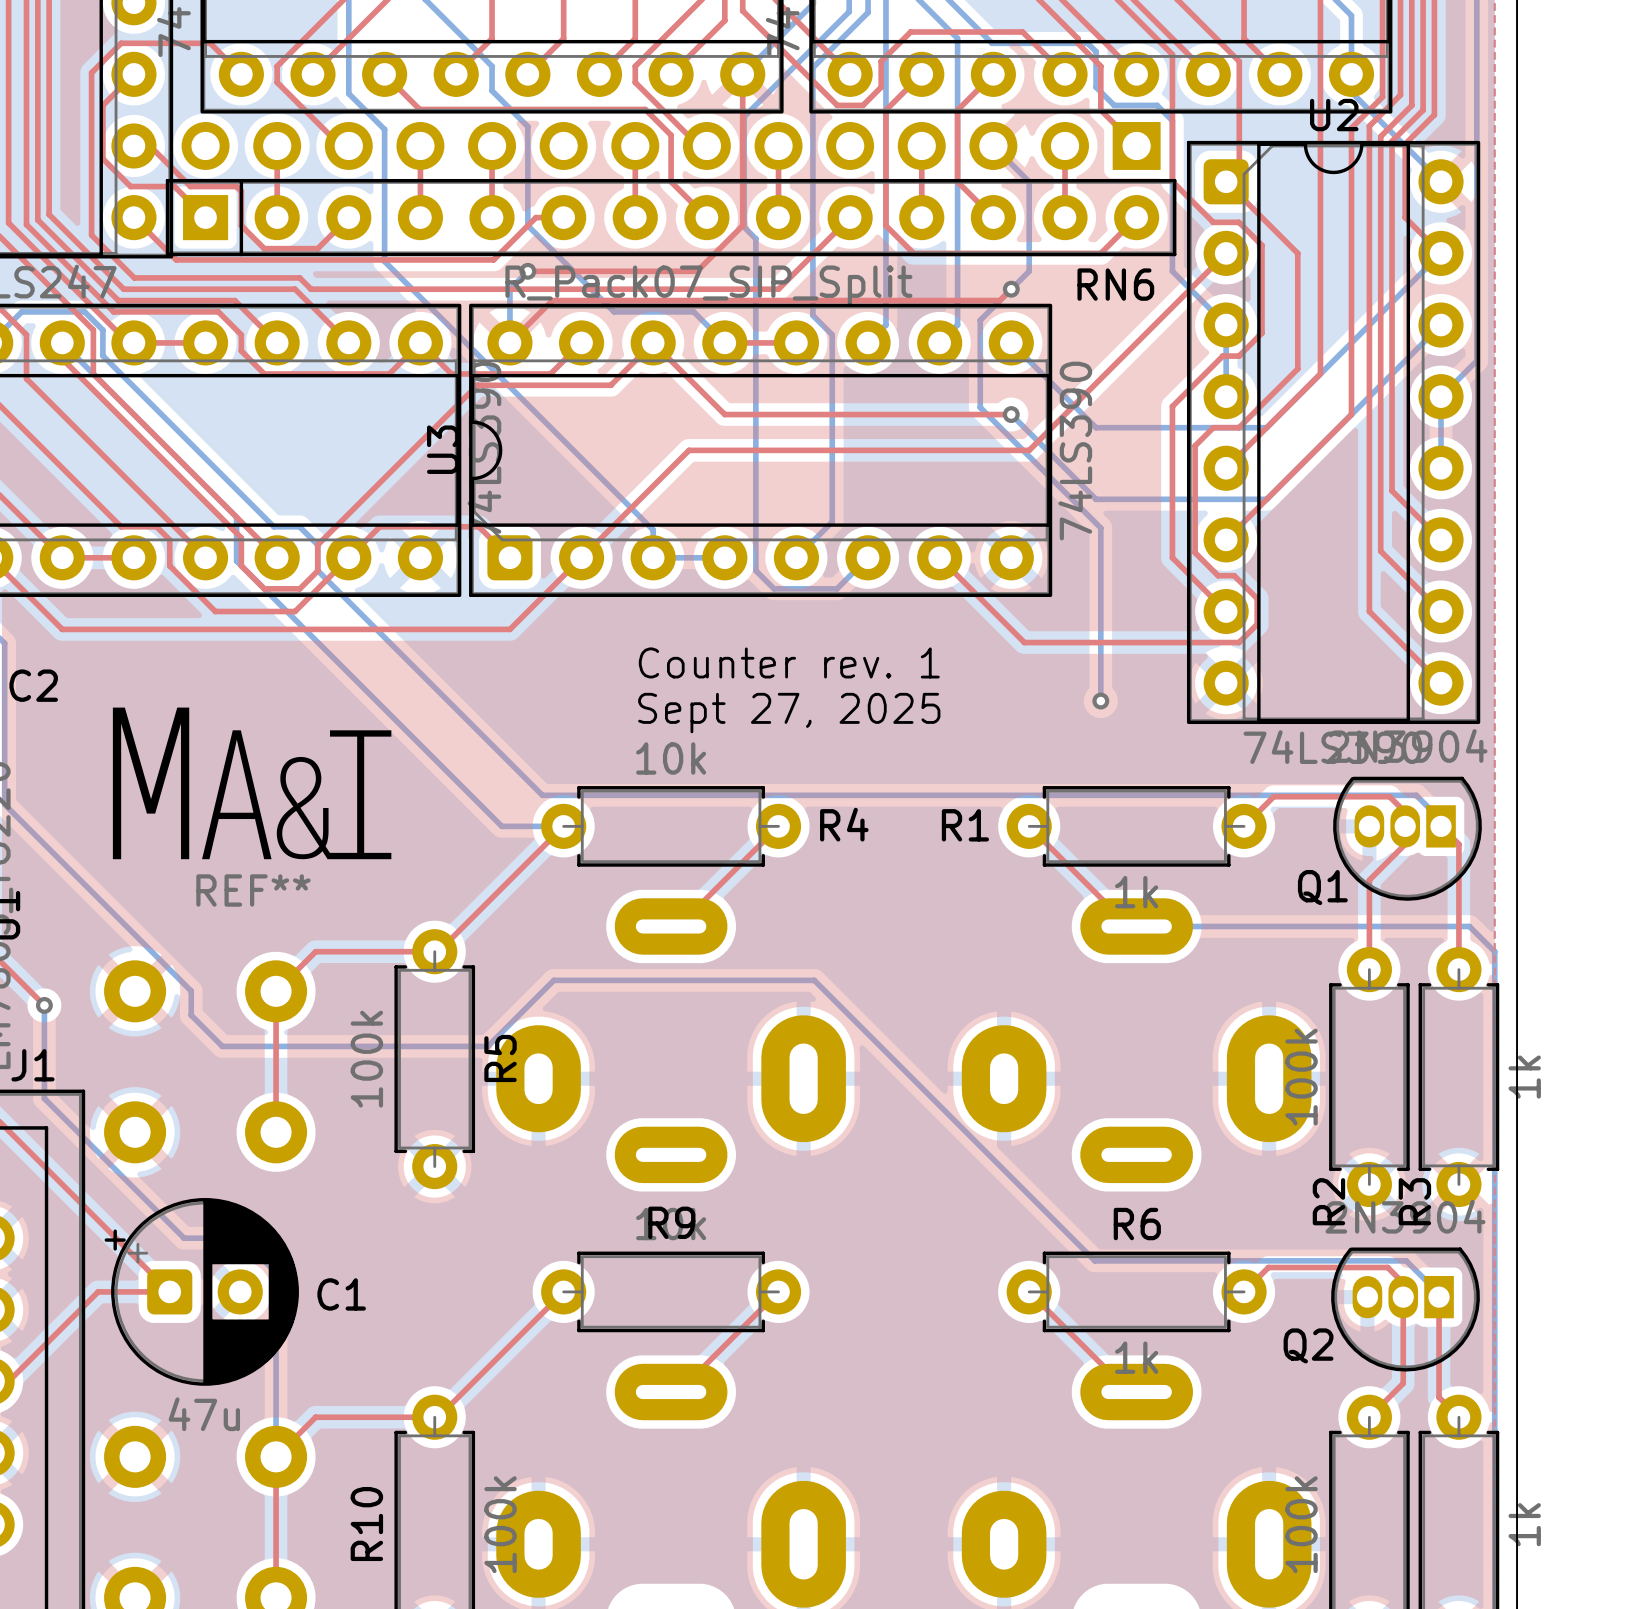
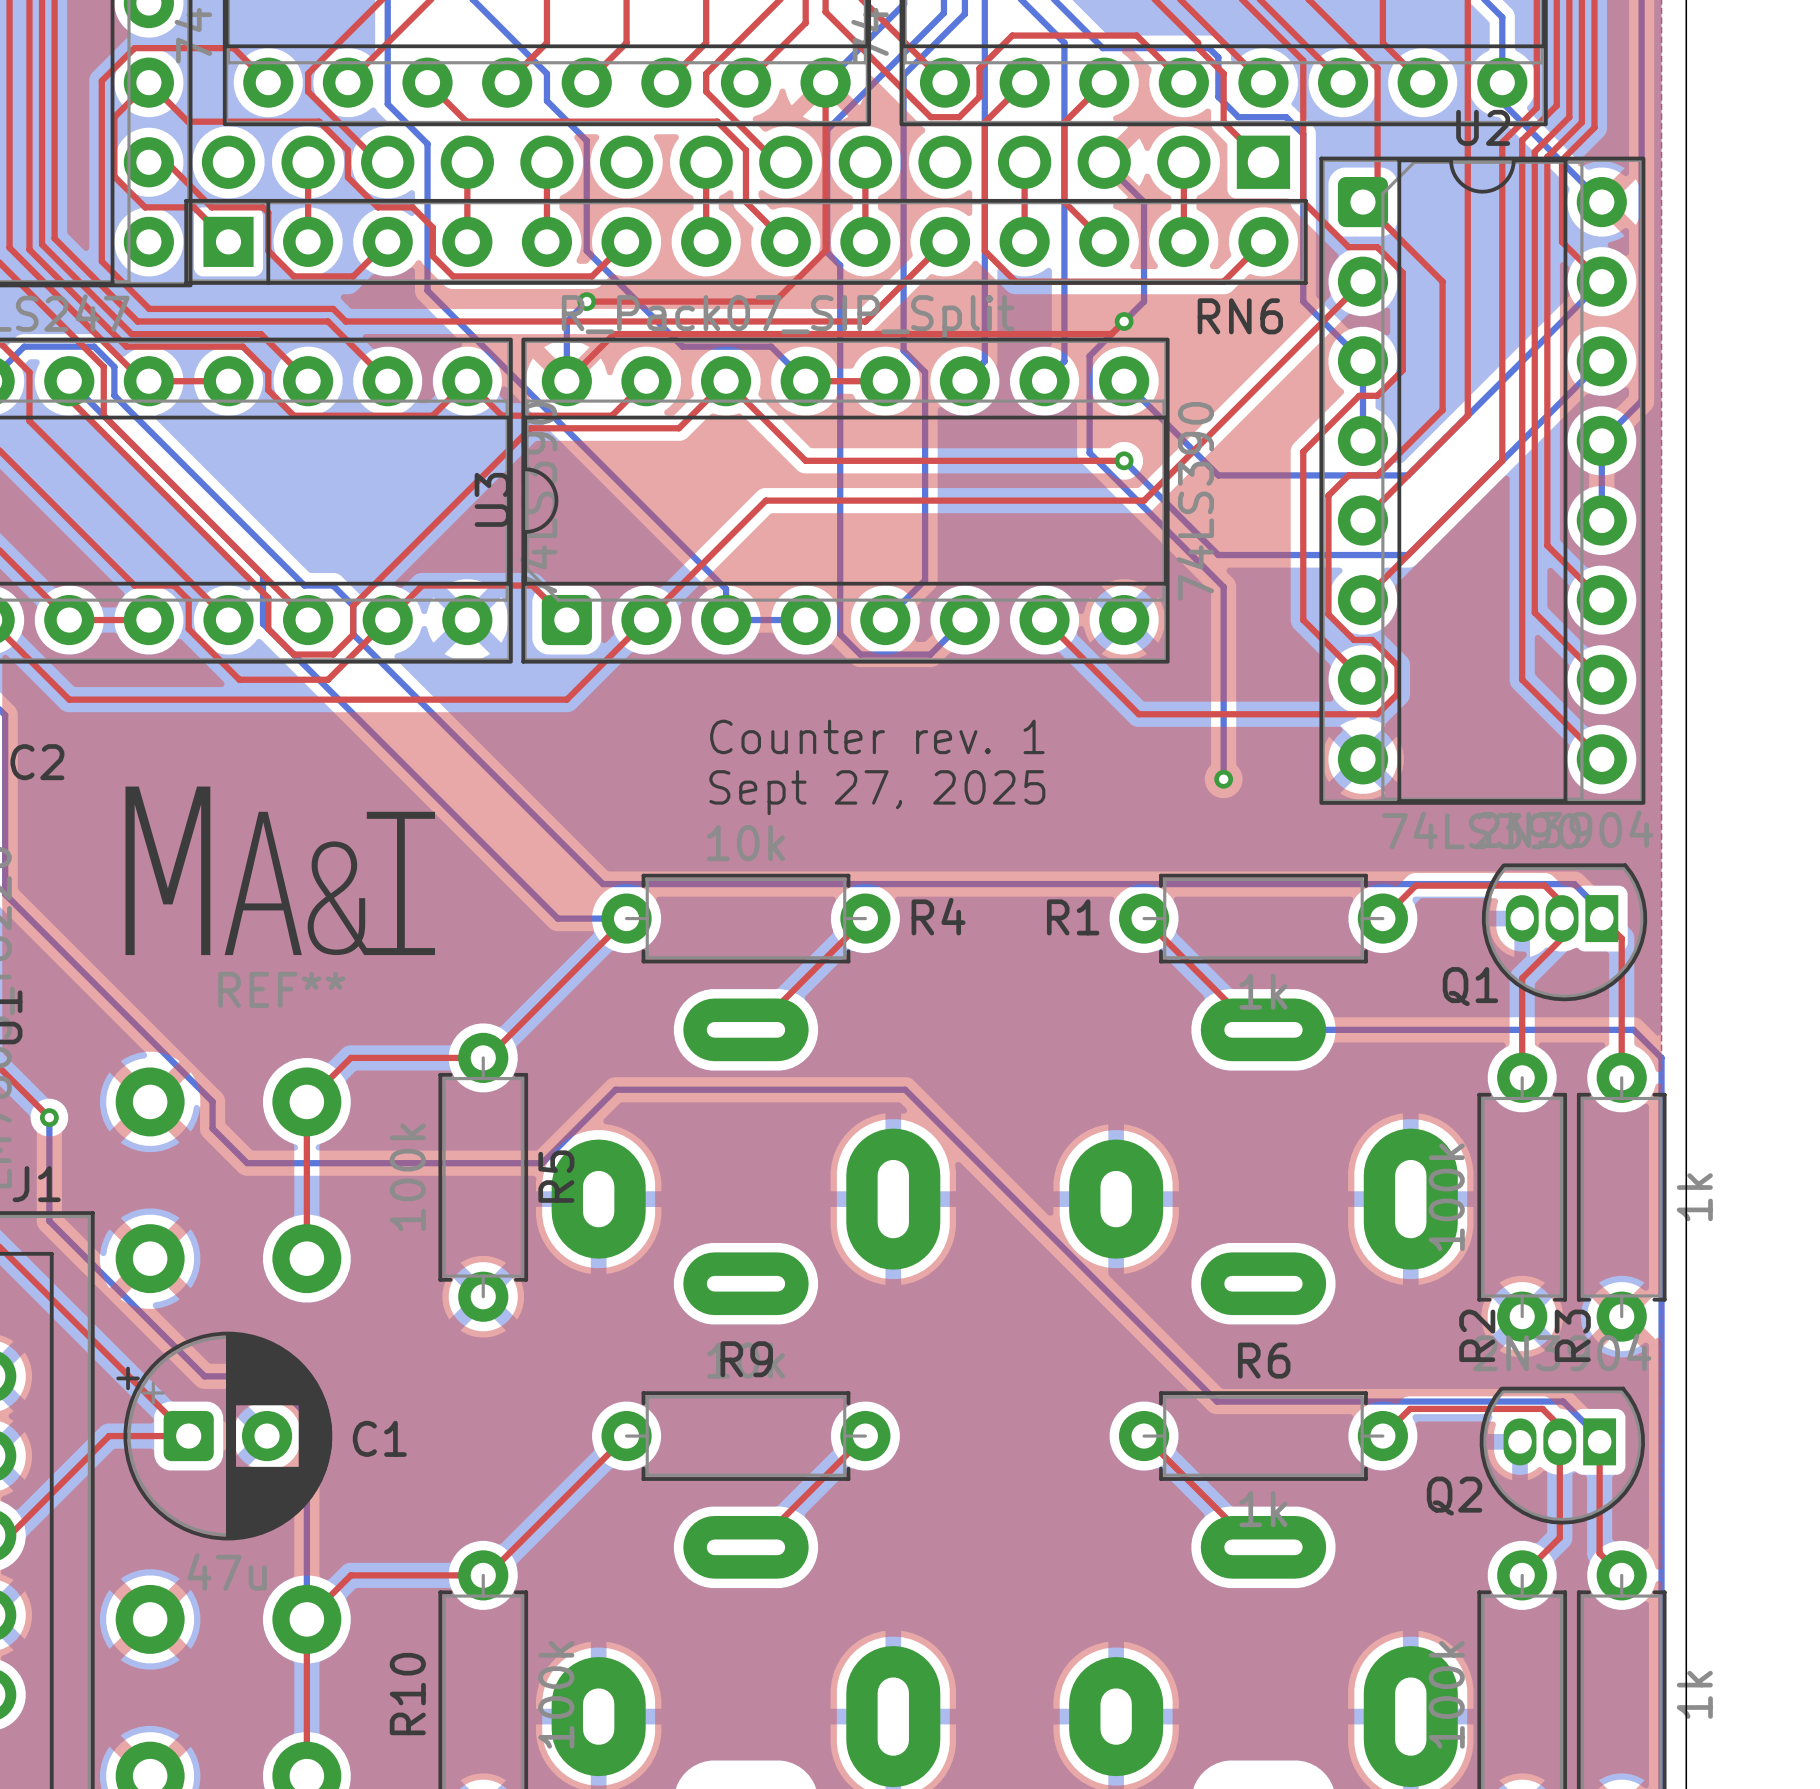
top track: (133, 217) (176, 259) (493, 259) (535, 217) (563, 217) -> (148, 82) (187, 121) (319, 121) (347, 150) (347, 177) (377, 207) (412, 207) (432, 227) (432, 256) (453, 276) (592, 276) (626, 241)

